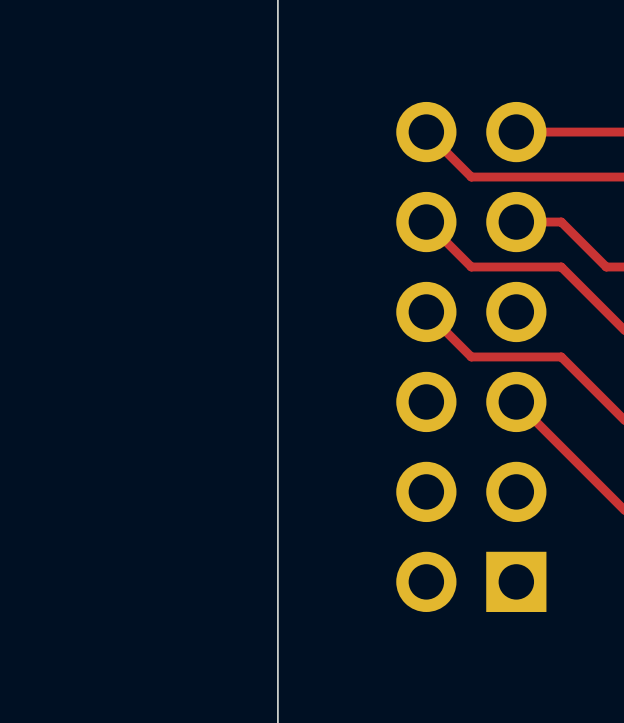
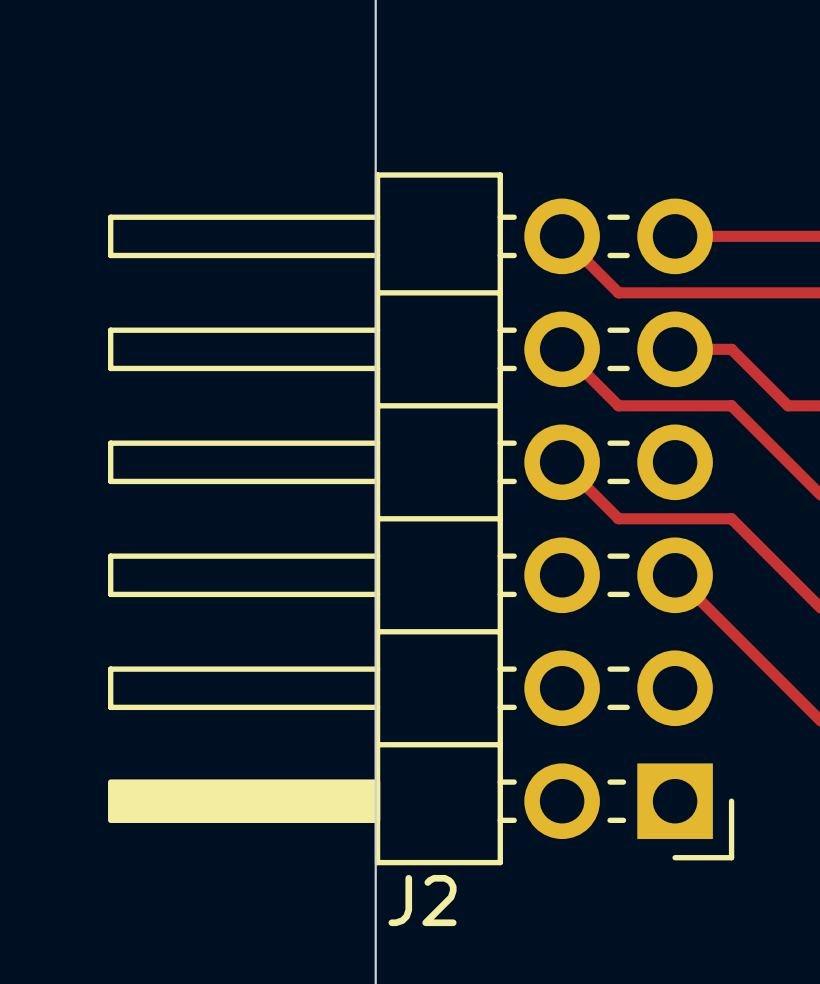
J2: none -> (421, 518)

